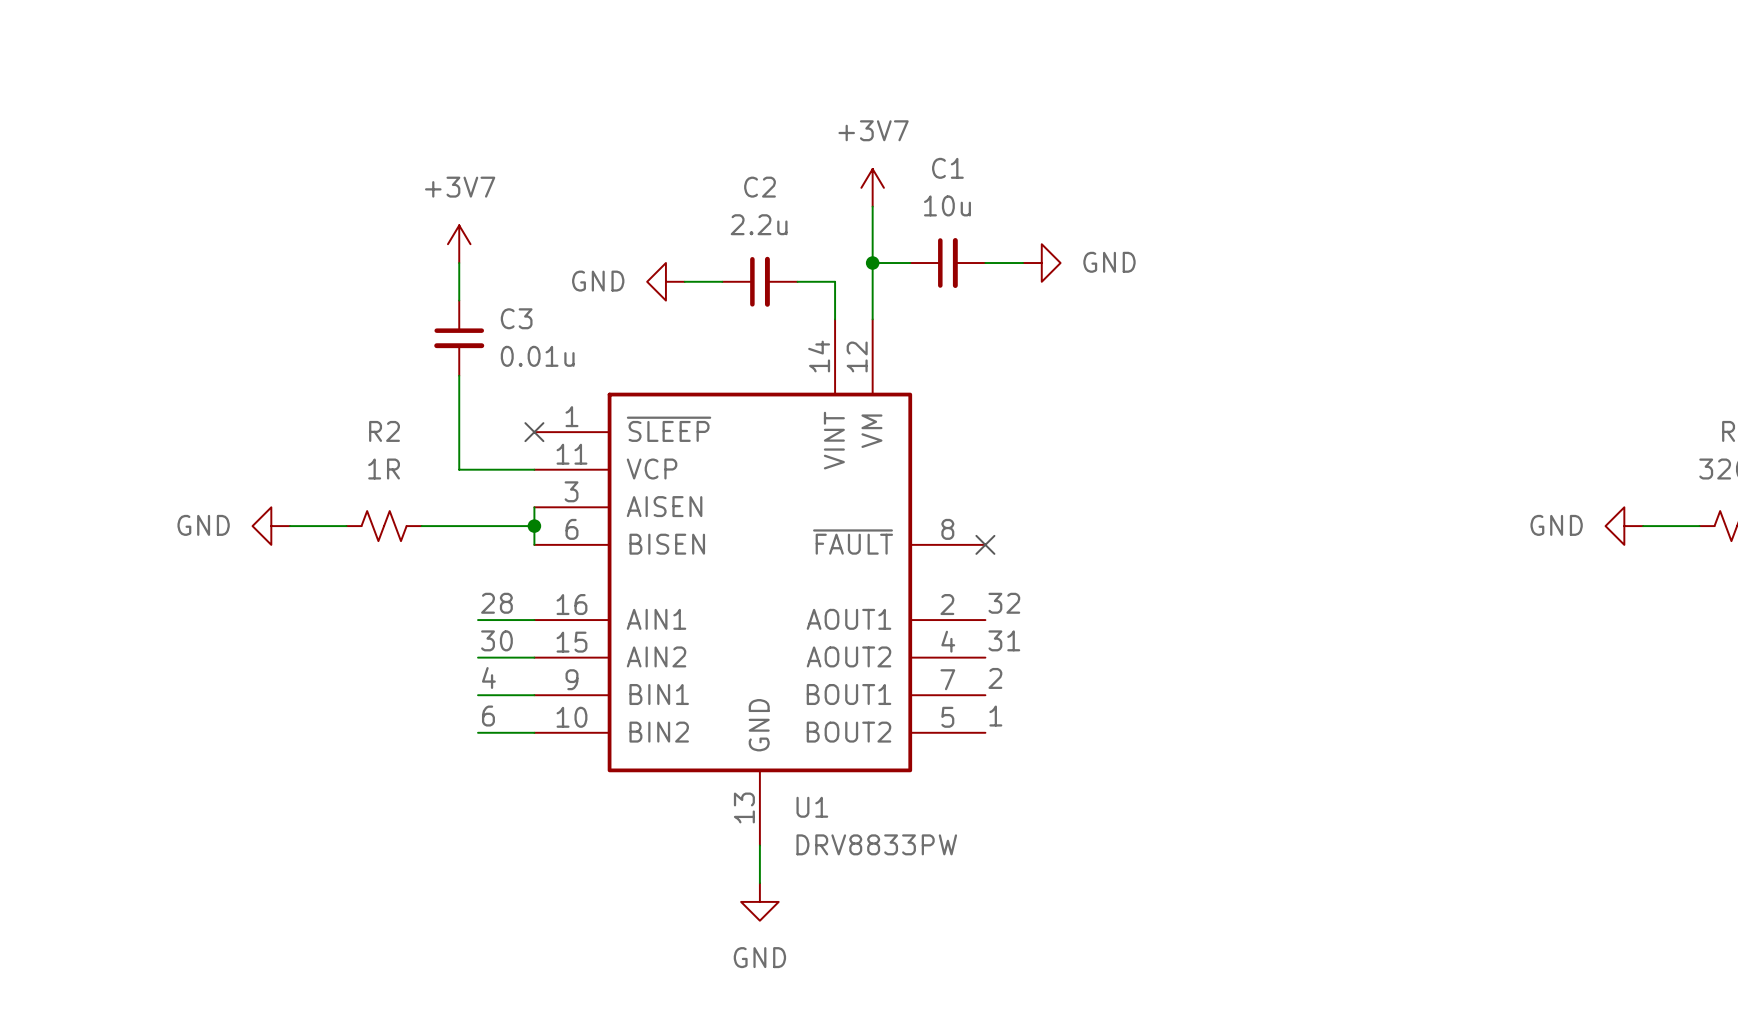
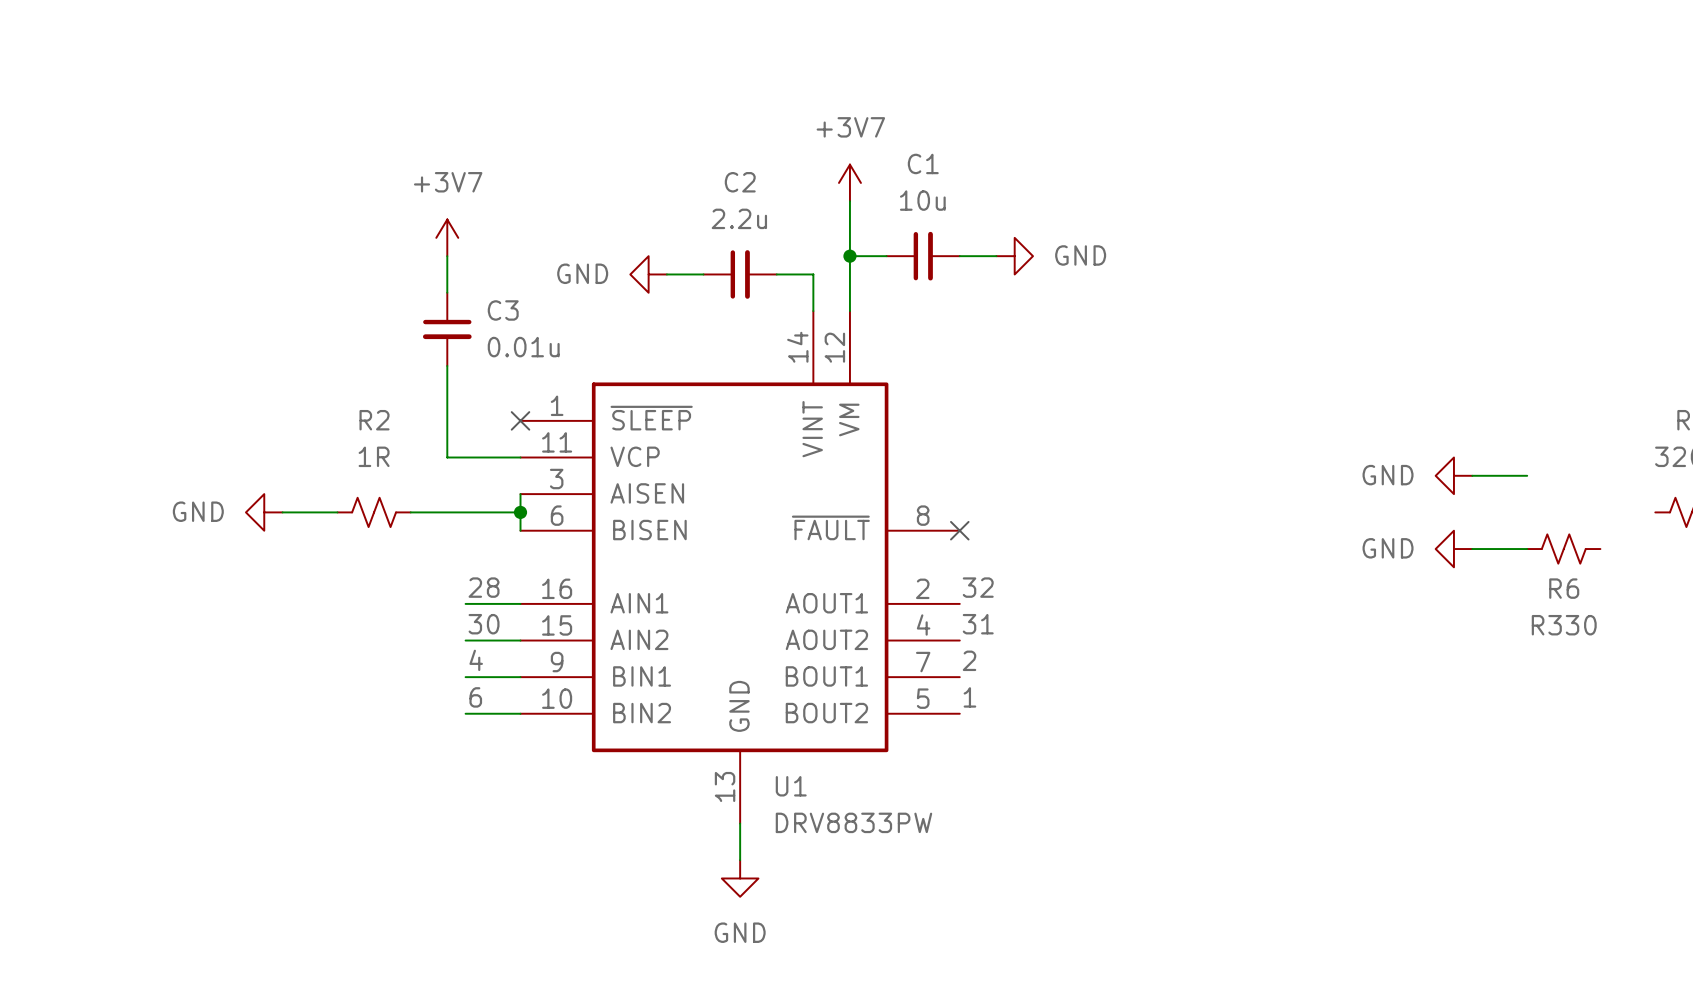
power symbol: none -> GND (1453, 475)
wire: none -> (1472, 475) (1527, 475)
power symbol: GND (1624, 526) -> none
wire: (1643, 526) (1699, 526) -> (1472, 549) (1527, 549)
power symbol: none -> GND (1453, 549)
R6: none -> R330 (1563, 549)

